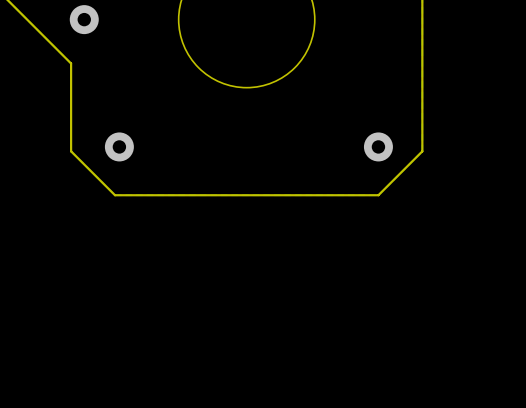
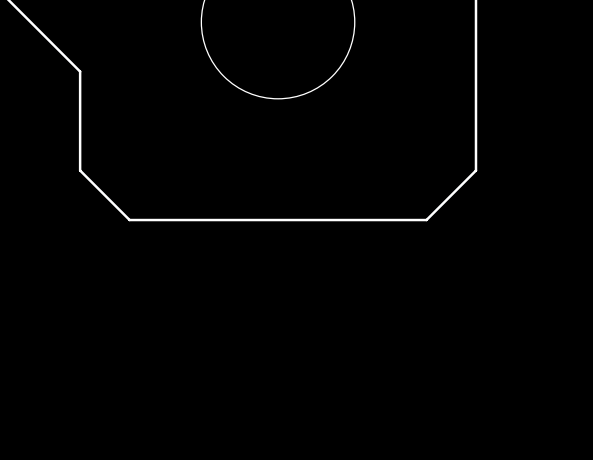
via: (84, 19) -> none
via: (119, 146) -> none
via: (378, 146) -> none

